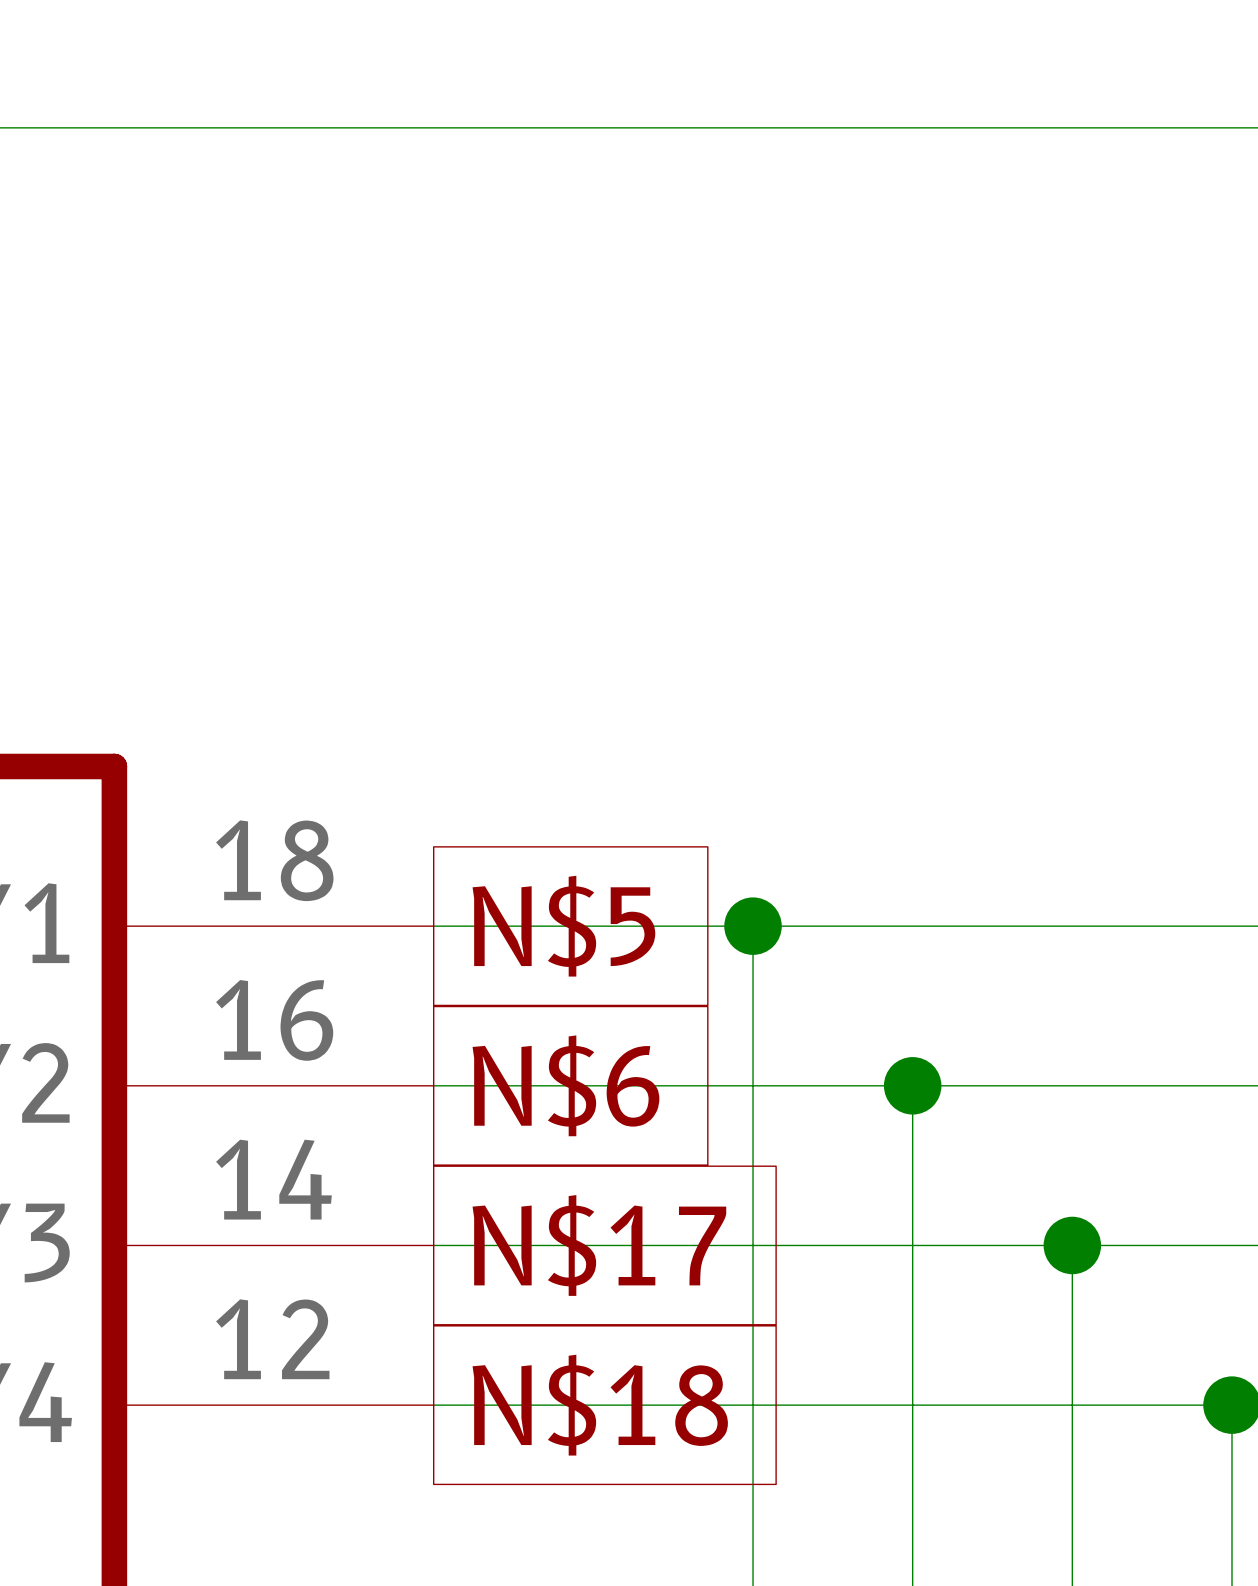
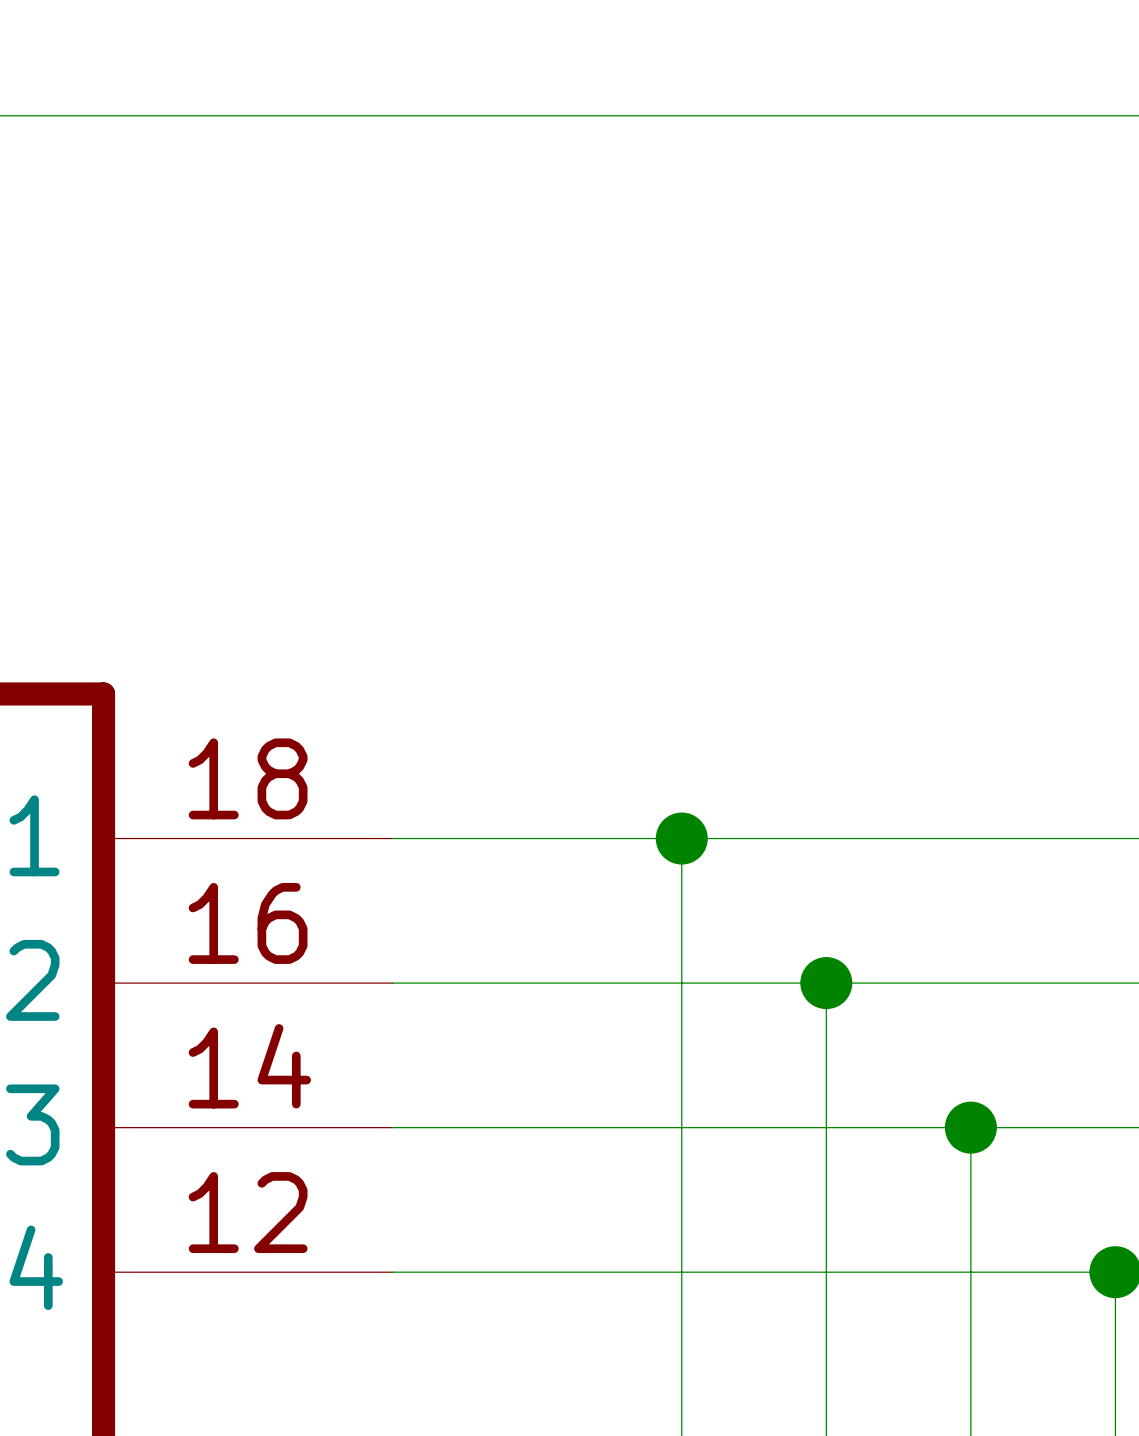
global label: N$5 (563, 926) -> none
global label: N$6 (565, 1085) -> none
global label: N$17 (599, 1245) -> none
global label: N$18 (600, 1405) -> none

